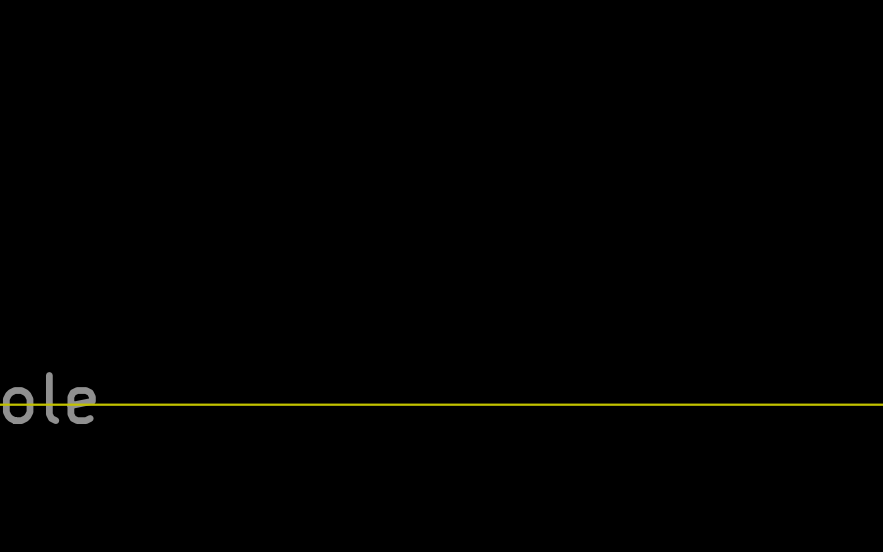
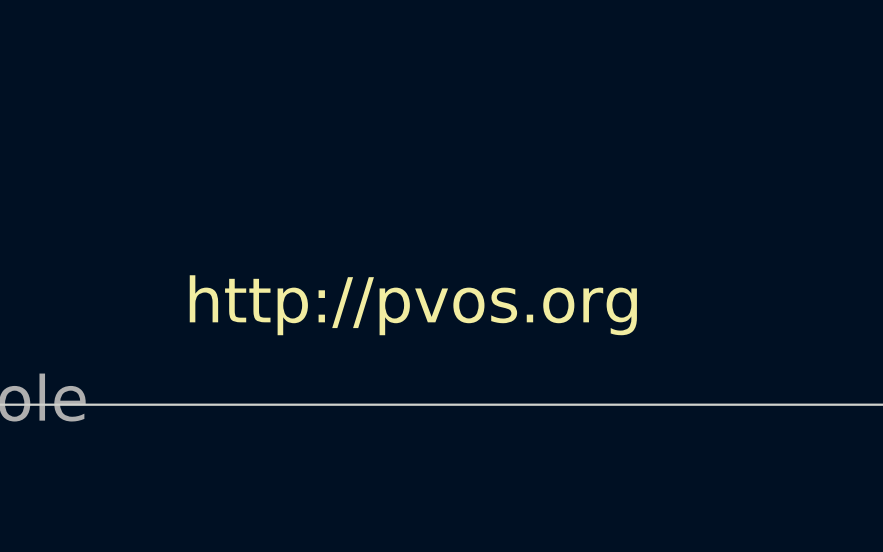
text: none -> http://pvos.org (413, 305)

